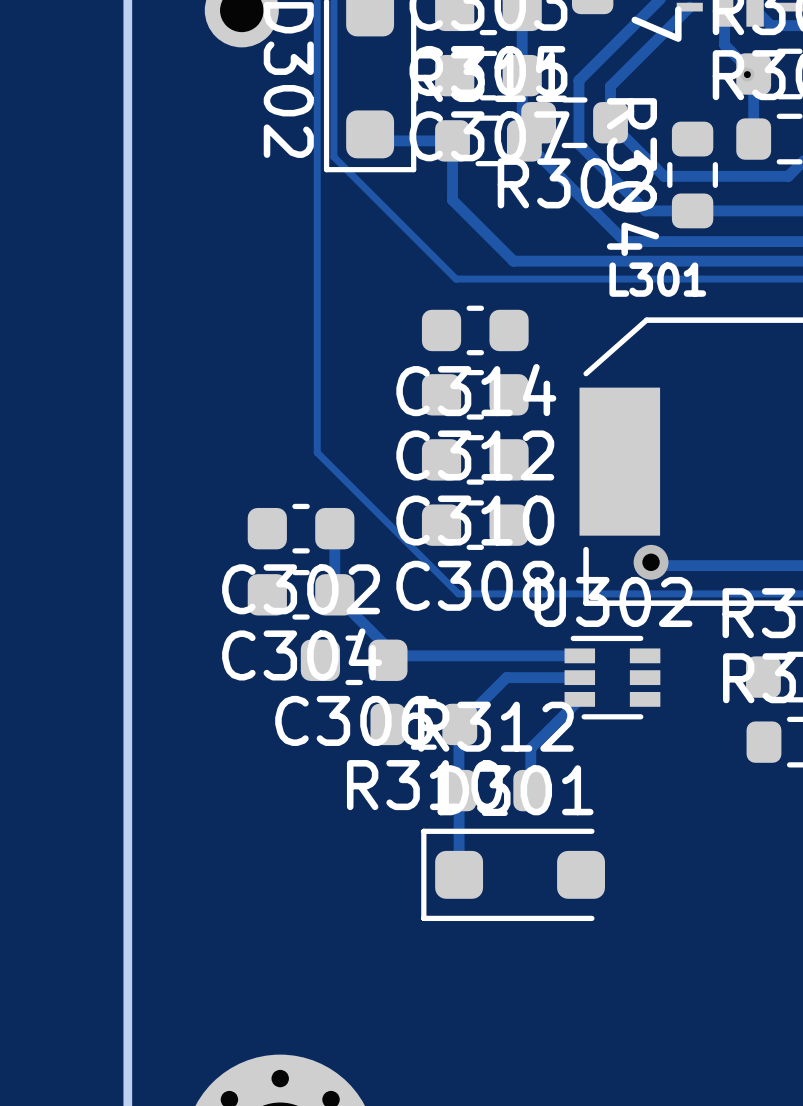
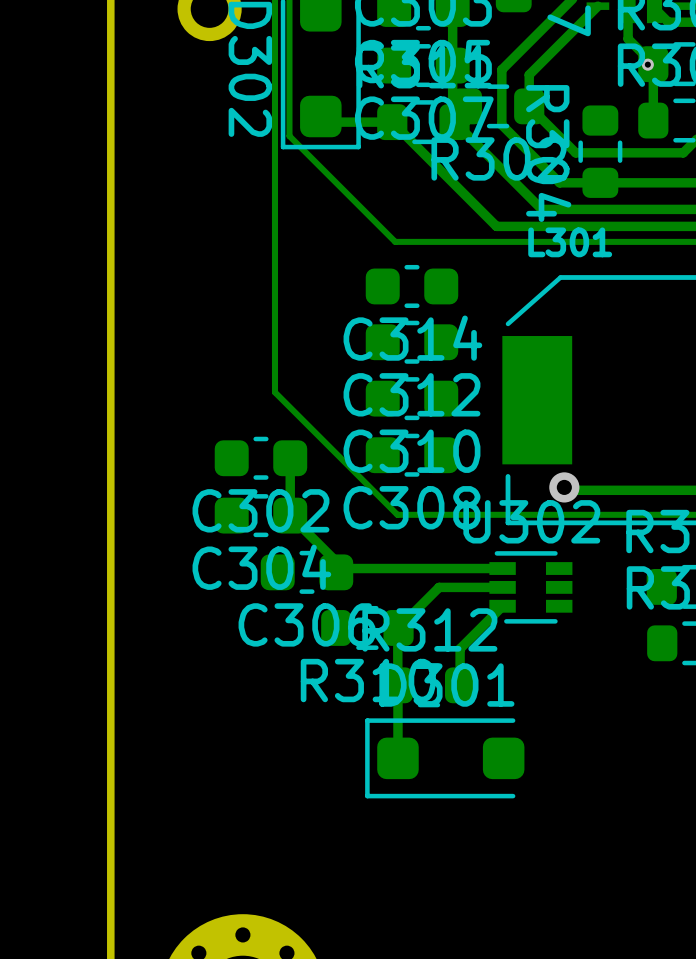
track: (452, 140) (452, 200) (513, 261) (572, 261) -> (392, 122) (496, 226)

